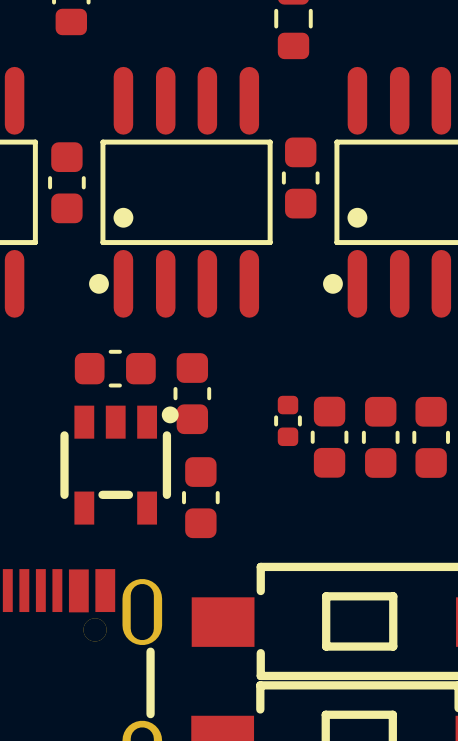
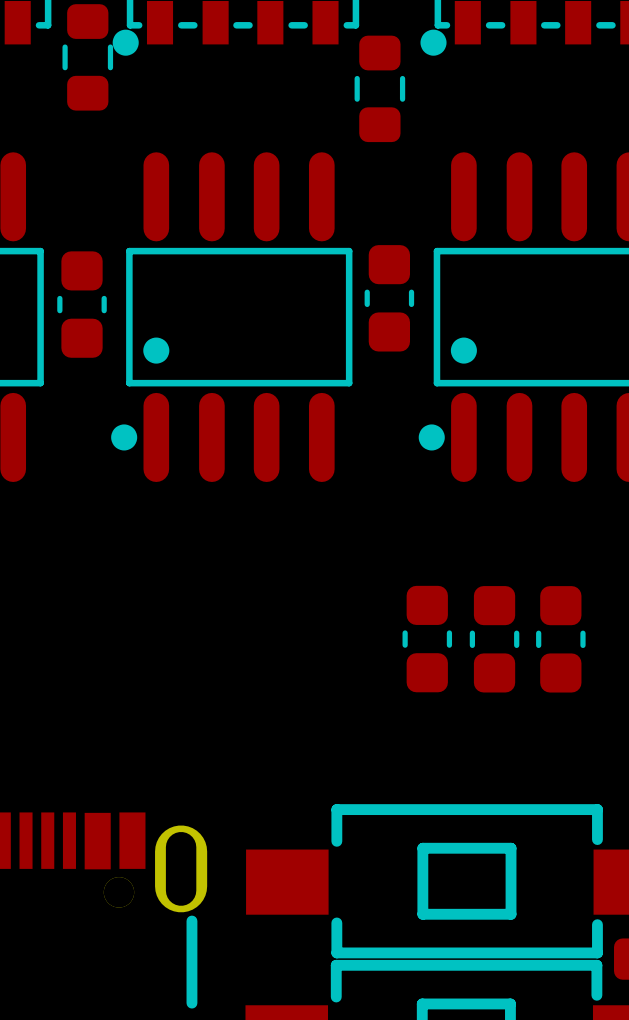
part: (115, 368) -> none
part: (192, 393) -> none
part: (288, 420) -> none
part: (119, 465) -> none
part: (200, 497) -> none

